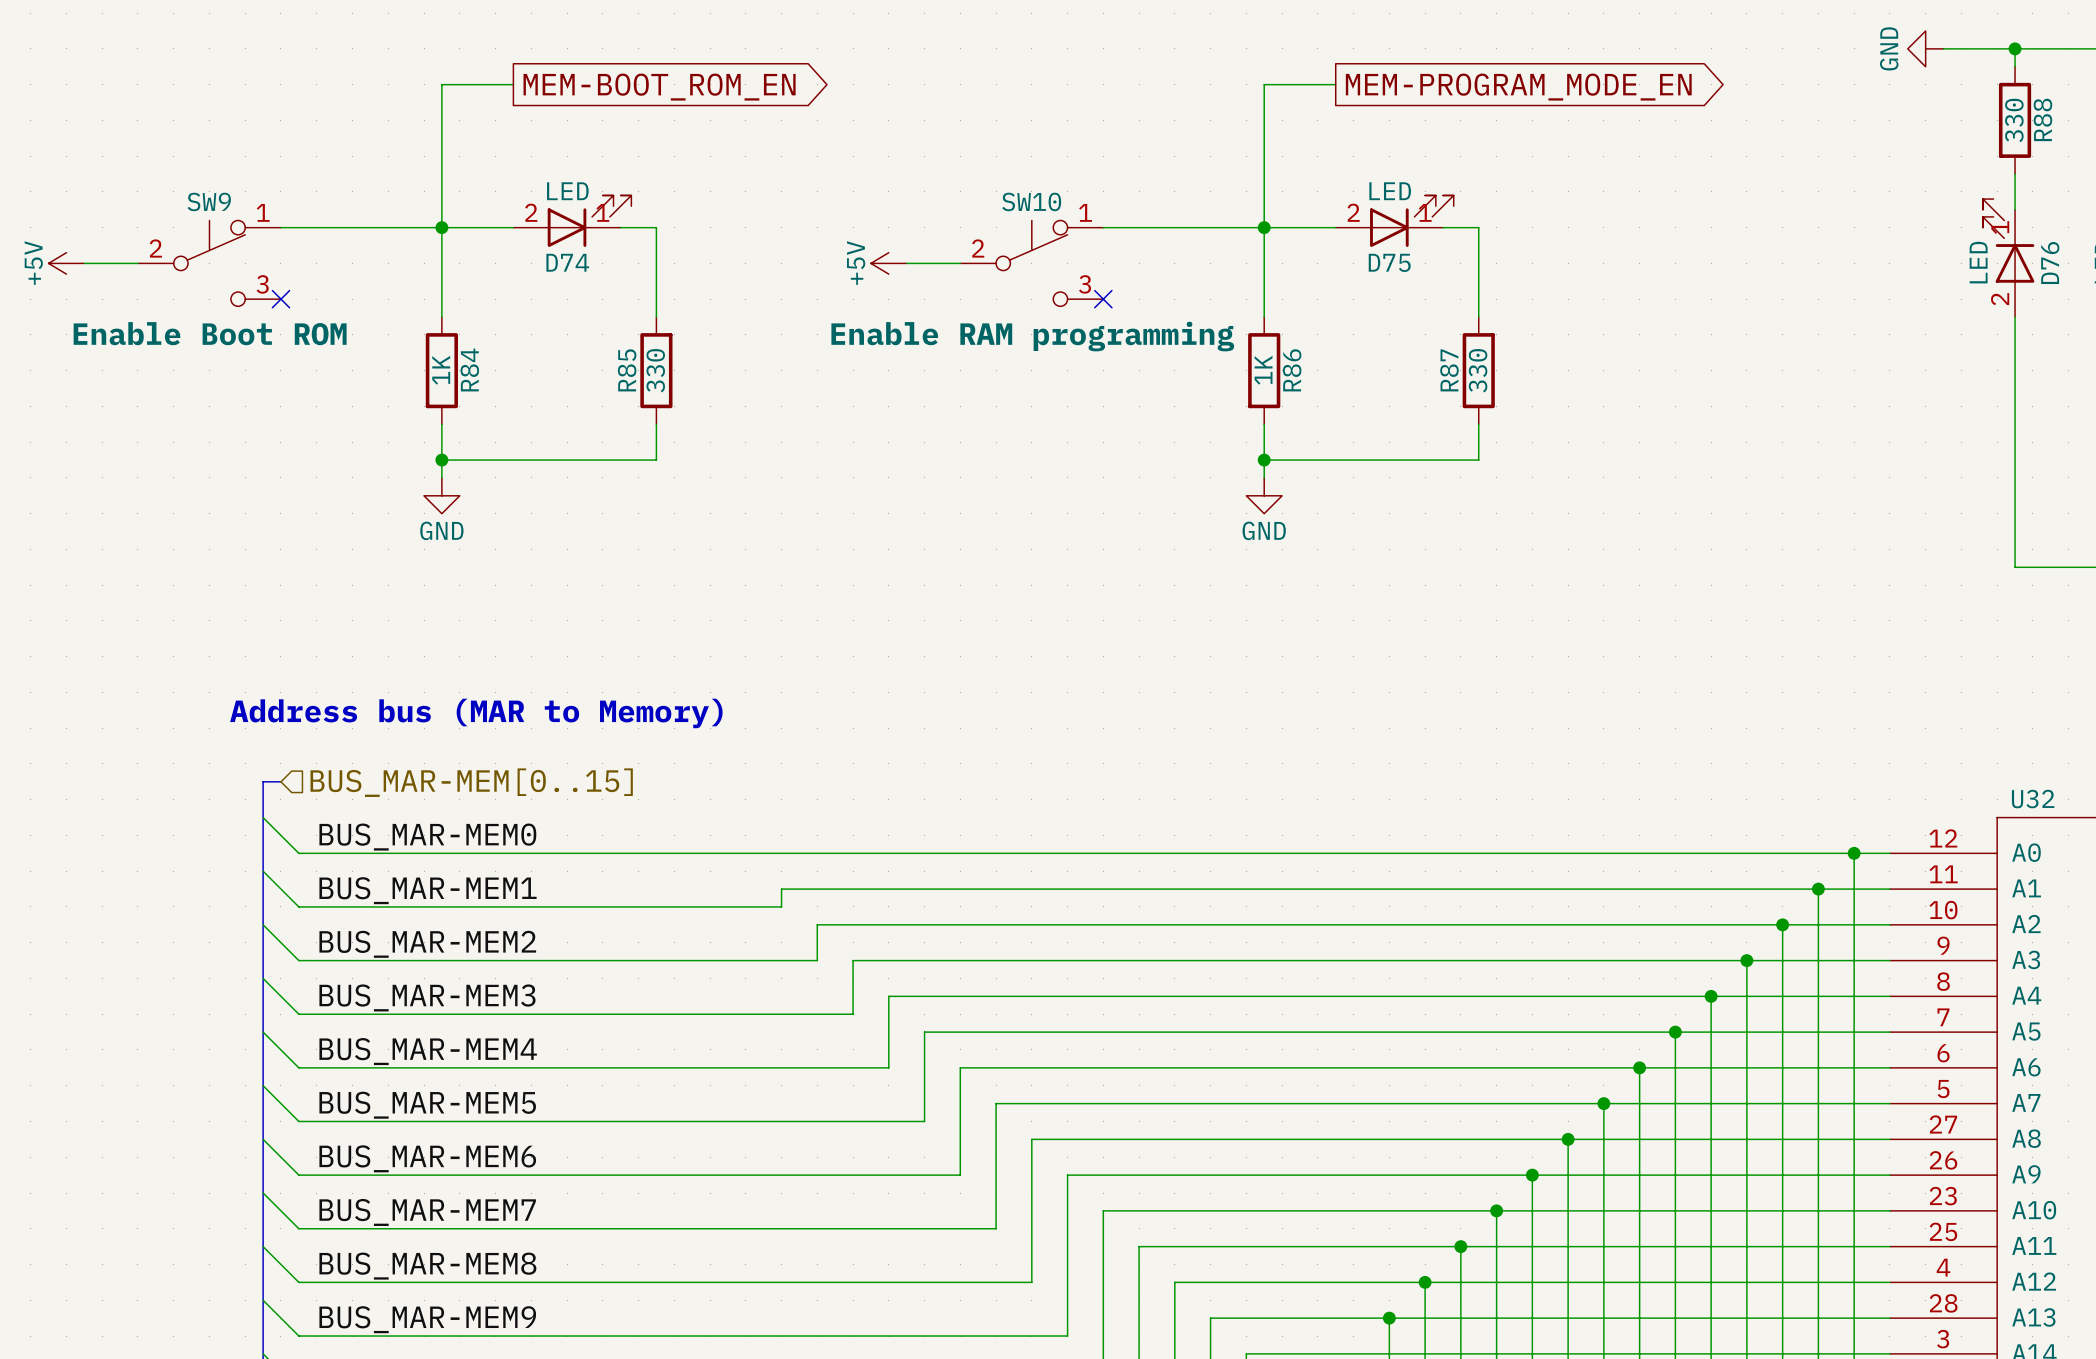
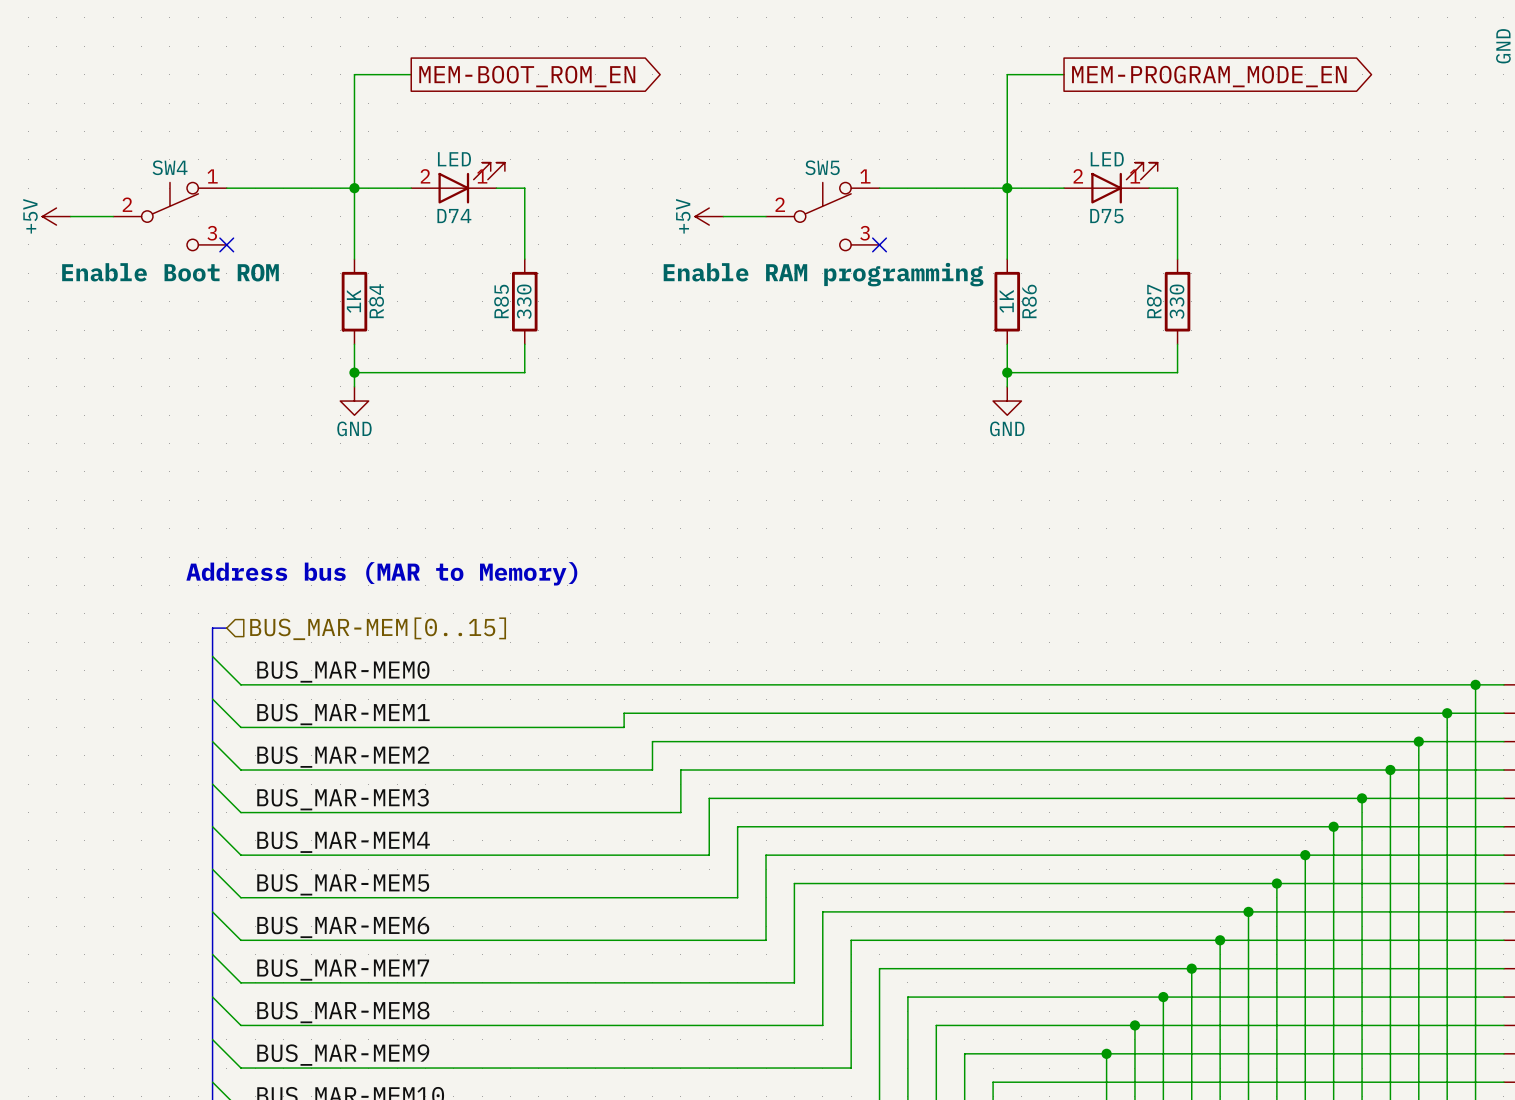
SW9 name: SW9 (209, 201) -> SW4 (170, 167)
SW10 name: SW10 (1031, 201) -> SW5 (822, 167)

